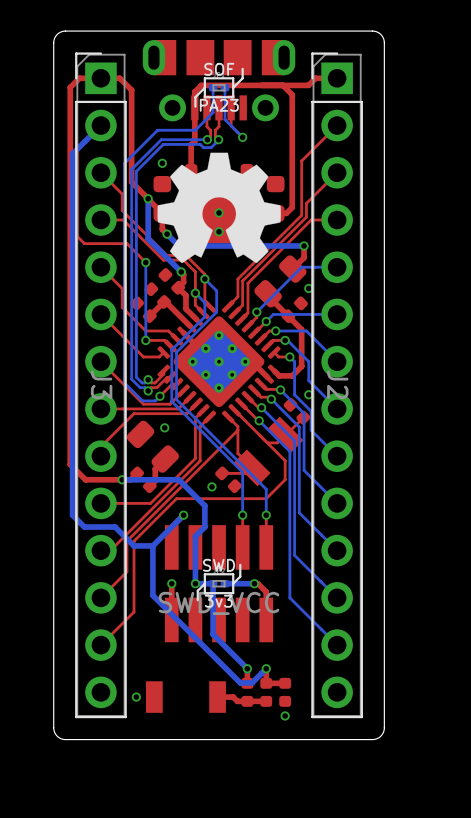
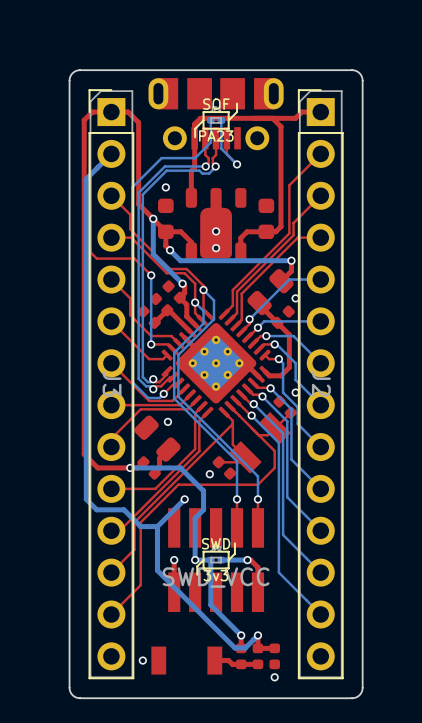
drawing: [157, 152, 281, 264] -> none

